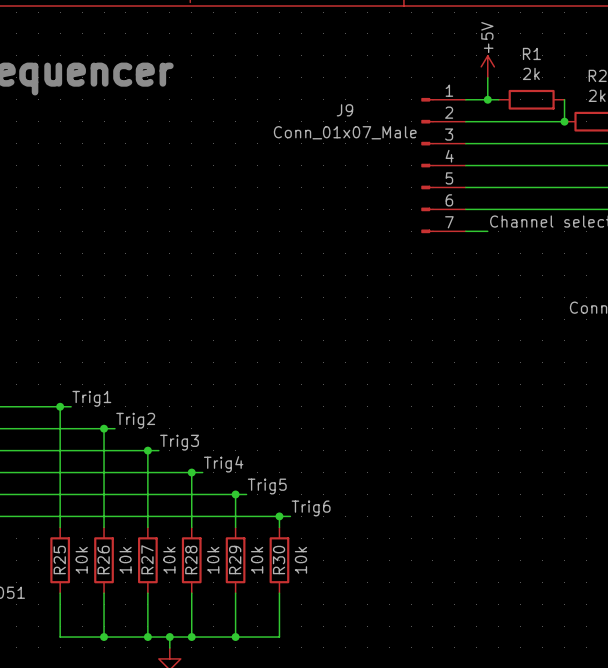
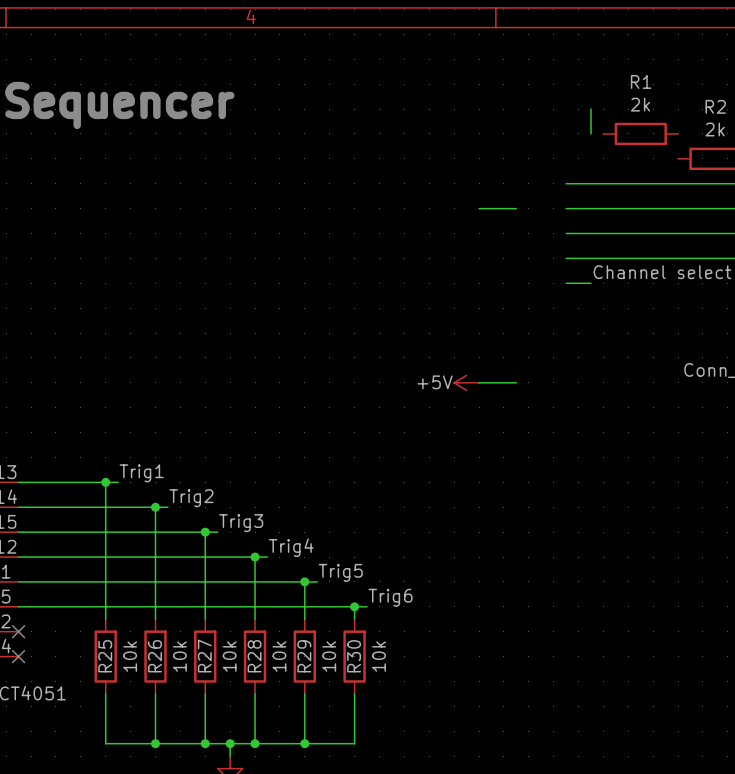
power symbol: +5V (487, 66) -> none
wire: (465, 99) (498, 99) -> (479, 208) (516, 208)
junction: (487, 99) -> none
wire: (564, 99) (564, 121) (465, 121) -> none
junction: (564, 121) -> none
J9: Conn_01x07_Male (443, 165) -> none
power symbol: none -> +5V (466, 382)
wire: none -> (479, 382) (516, 382)

